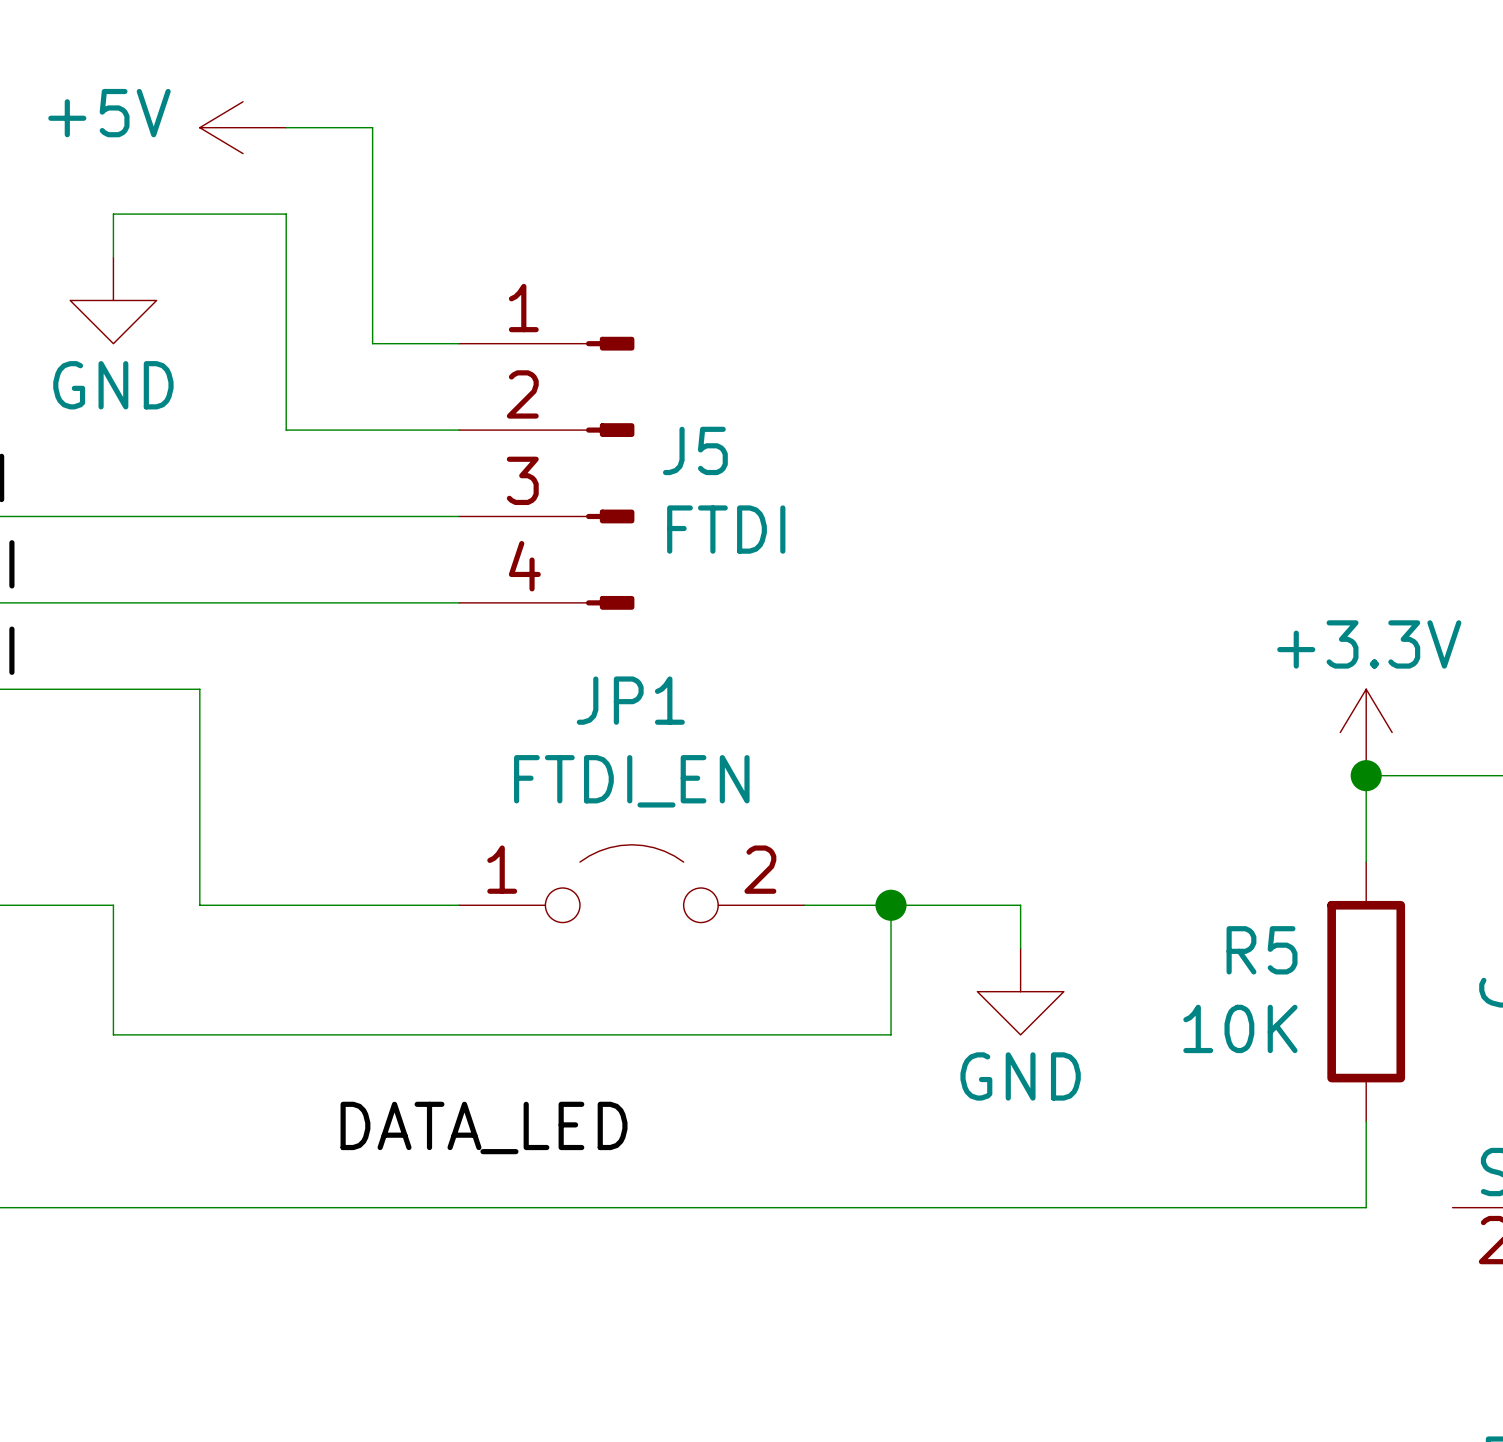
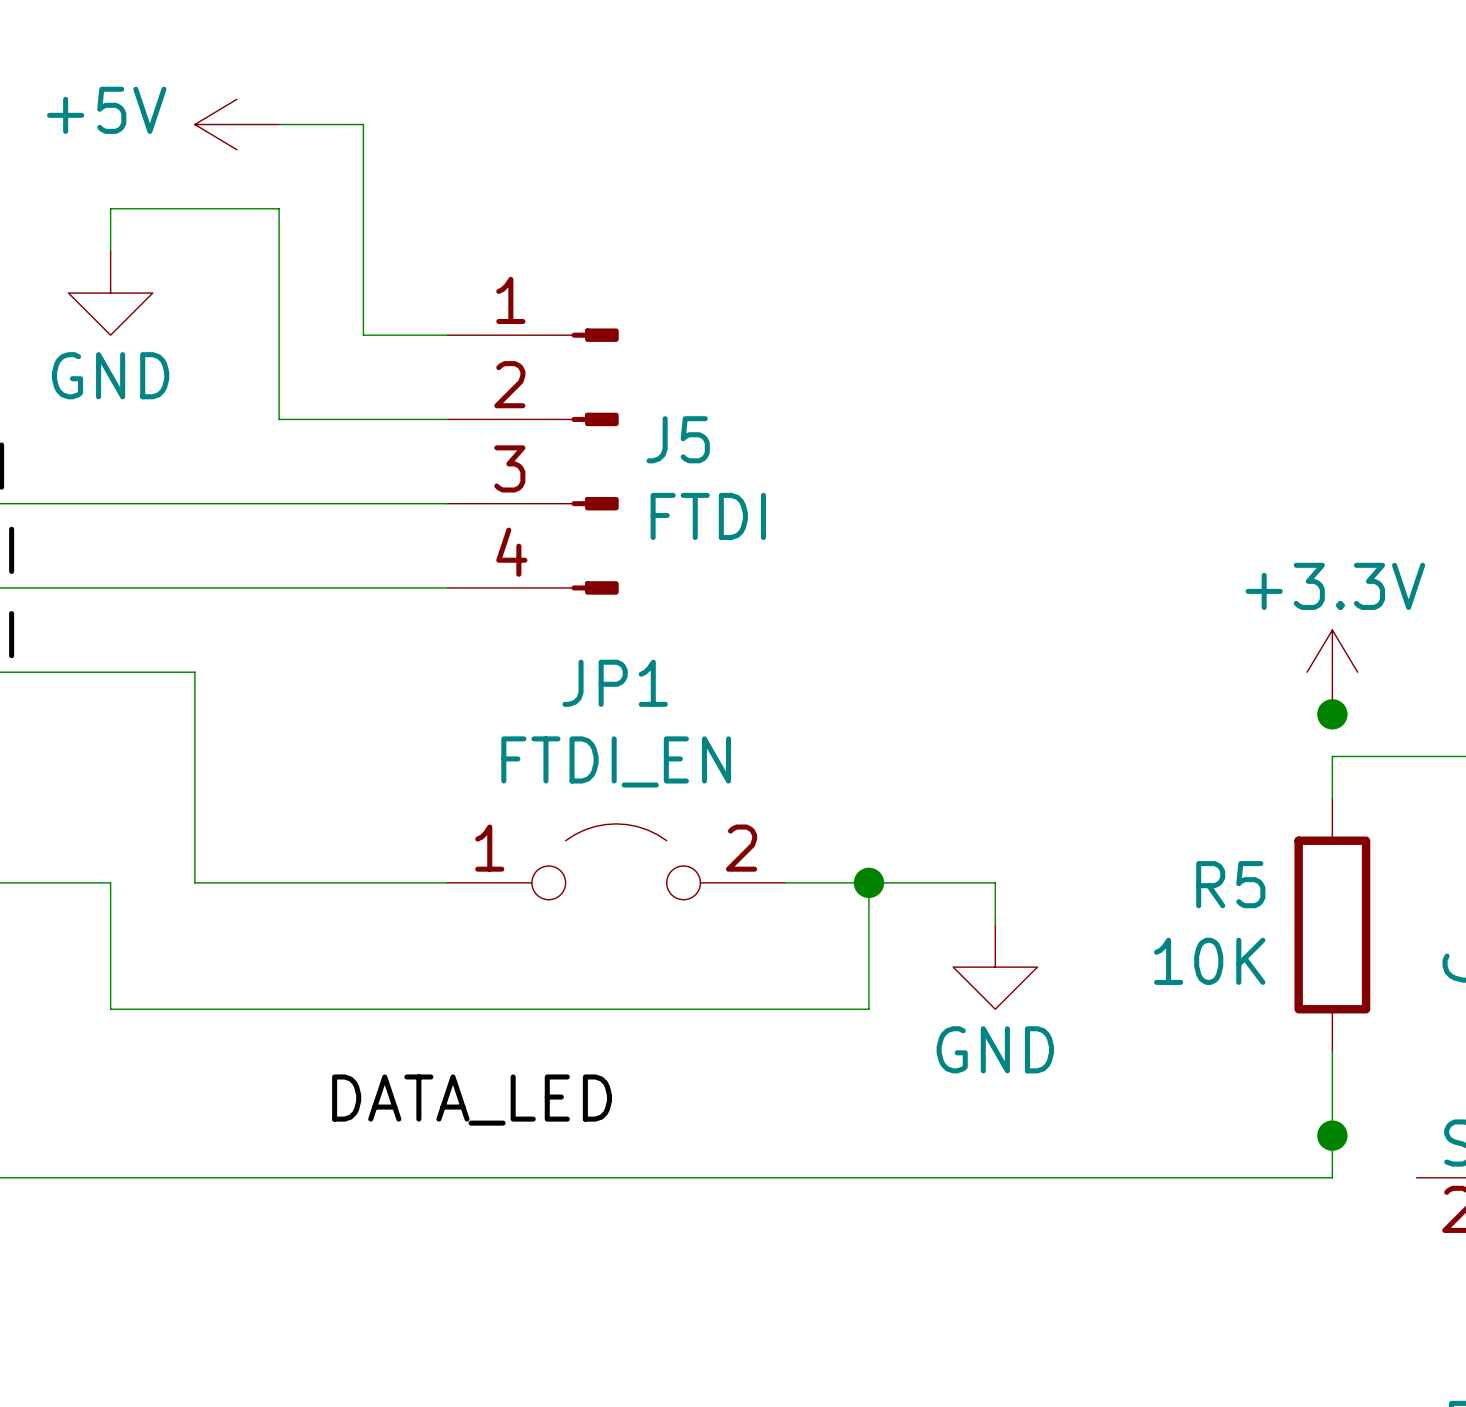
power symbol position: +3.3V (1366, 732) -> +3.3V (1332, 672)
junction position: (1366, 775) -> (1332, 714)
R5 position: (1366, 991) -> (1332, 924)
junction: none -> (1332, 1135)

